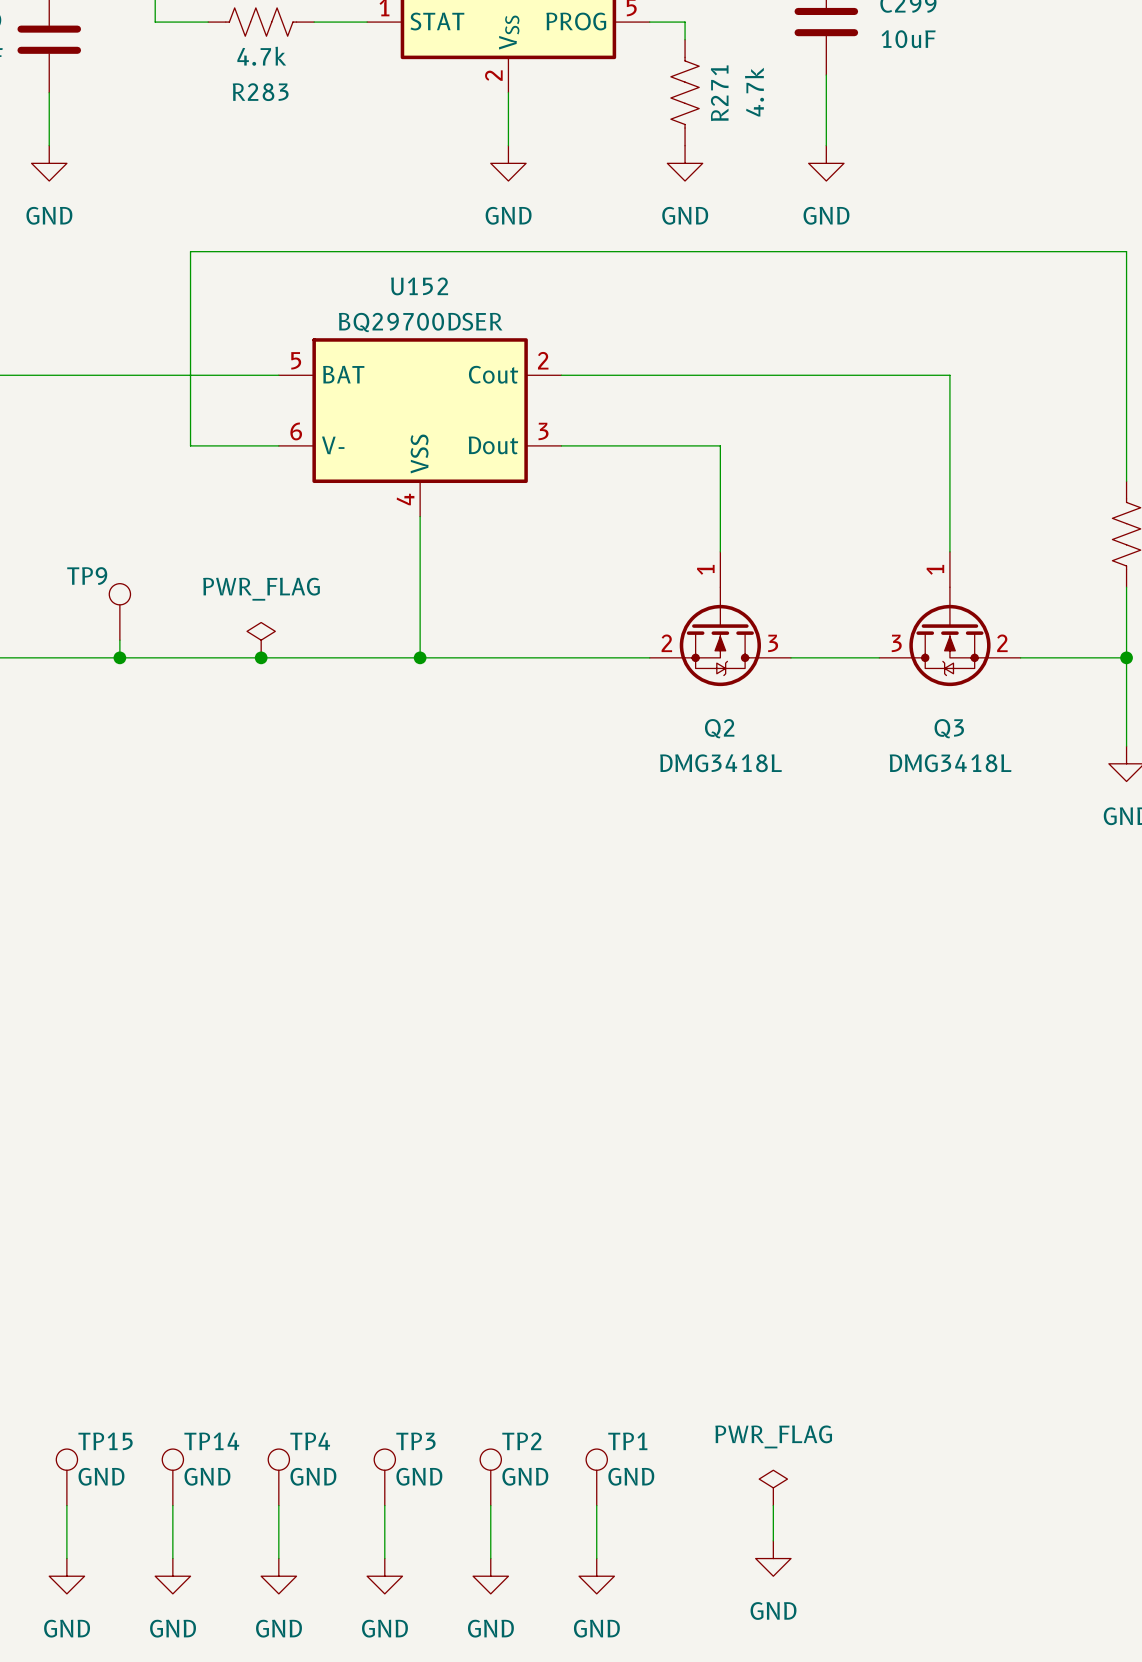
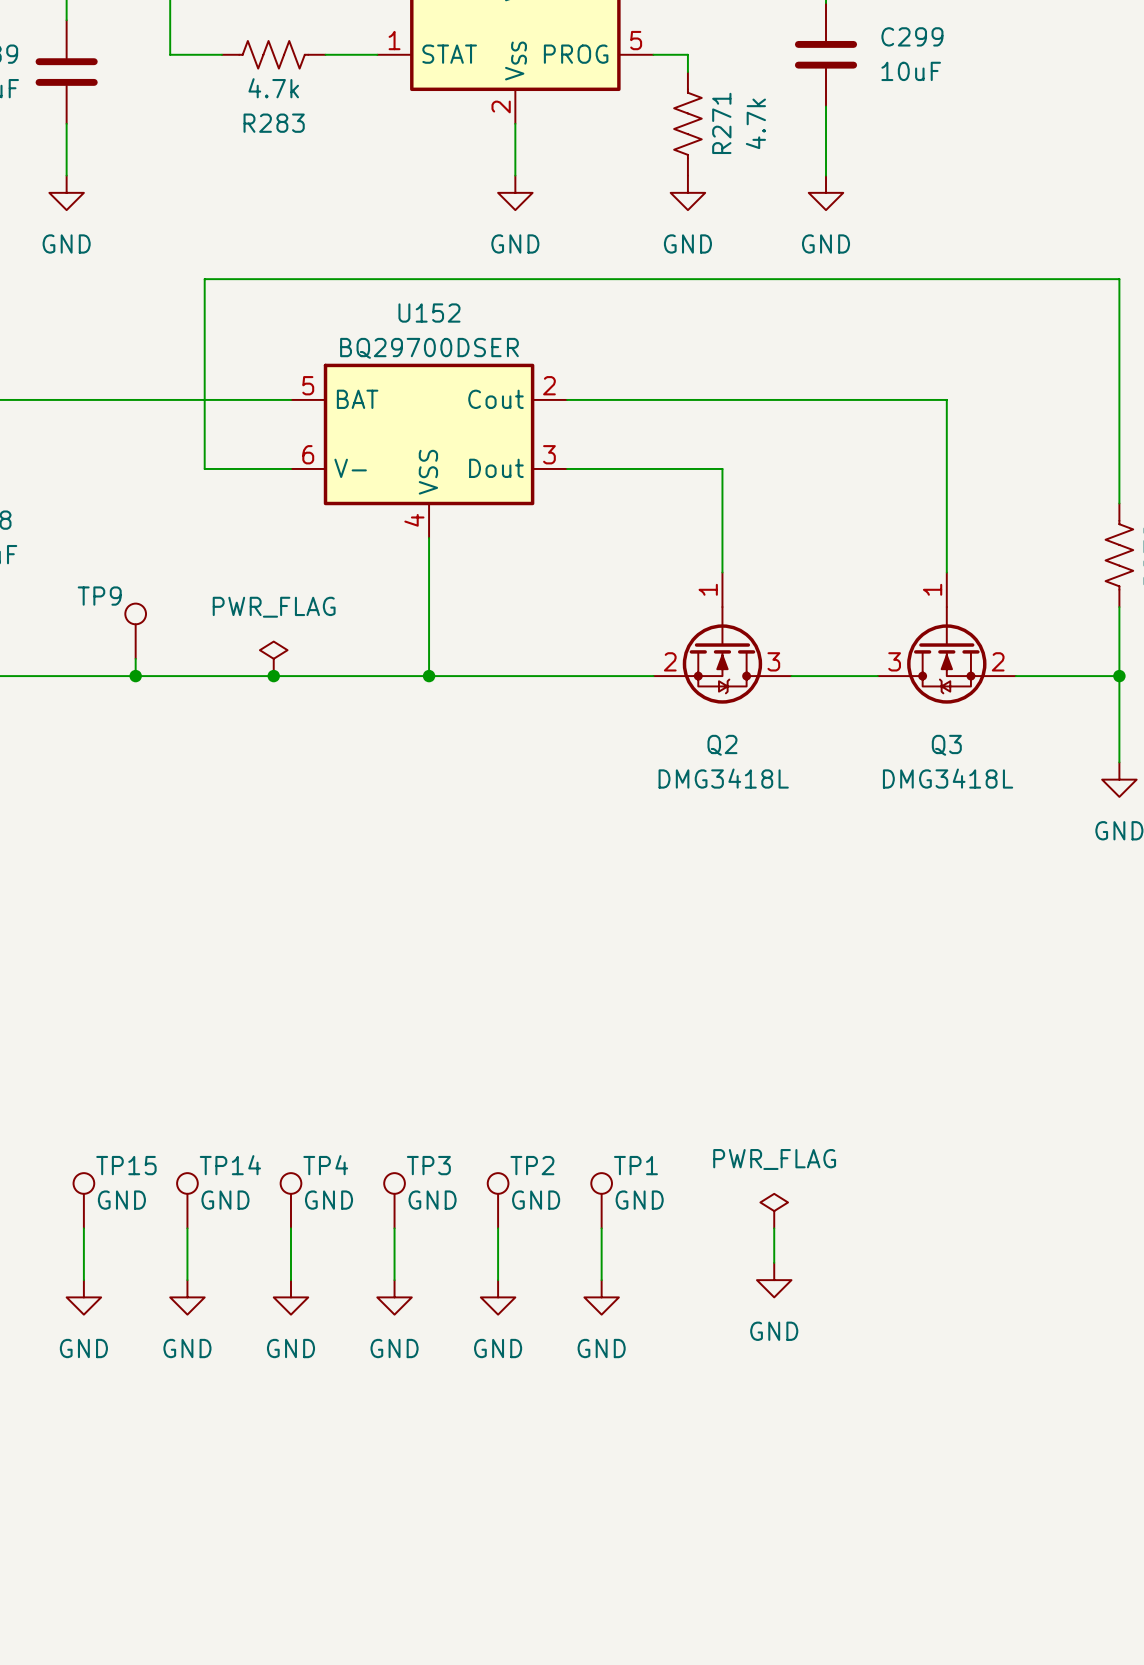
power symbol: none -> GND (774, 1280)
power symbol: none -> GND (83, 1297)
power symbol: none -> GND (187, 1297)
power symbol: none -> GND (290, 1297)
power symbol: none -> GND (394, 1297)
power symbol: none -> GND (498, 1297)
power symbol: none -> GND (601, 1297)
TP15 position: (66, 1477) -> (83, 1200)
TP14 position: (172, 1477) -> (187, 1200)
TP4 position: (278, 1477) -> (290, 1200)
TP3 position: (384, 1477) -> (394, 1200)
TP2 position: (490, 1477) -> (498, 1200)
TP1 position: (596, 1477) -> (601, 1200)
power symbol position: PWR_FLAG (773, 1487) -> PWR_FLAG (774, 1211)
wire: (66, 1505) (66, 1558) -> (83, 1228) (83, 1280)
wire: (172, 1505) (172, 1558) -> (187, 1228) (187, 1280)
wire: (278, 1505) (278, 1558) -> (290, 1228) (290, 1280)
wire: (384, 1505) (384, 1558) -> (394, 1228) (394, 1280)
wire: (490, 1505) (490, 1558) -> (498, 1228) (498, 1280)
wire: (596, 1505) (596, 1558) -> (601, 1228) (601, 1280)
wire: (773, 1505) (773, 1540) -> (774, 1228) (774, 1262)
power symbol: GND (773, 1558) -> none
power symbol: GND (66, 1576) -> none
power symbol: GND (172, 1576) -> none
power symbol: GND (278, 1576) -> none
power symbol: GND (384, 1576) -> none
power symbol: GND (490, 1576) -> none
power symbol: GND (596, 1576) -> none

